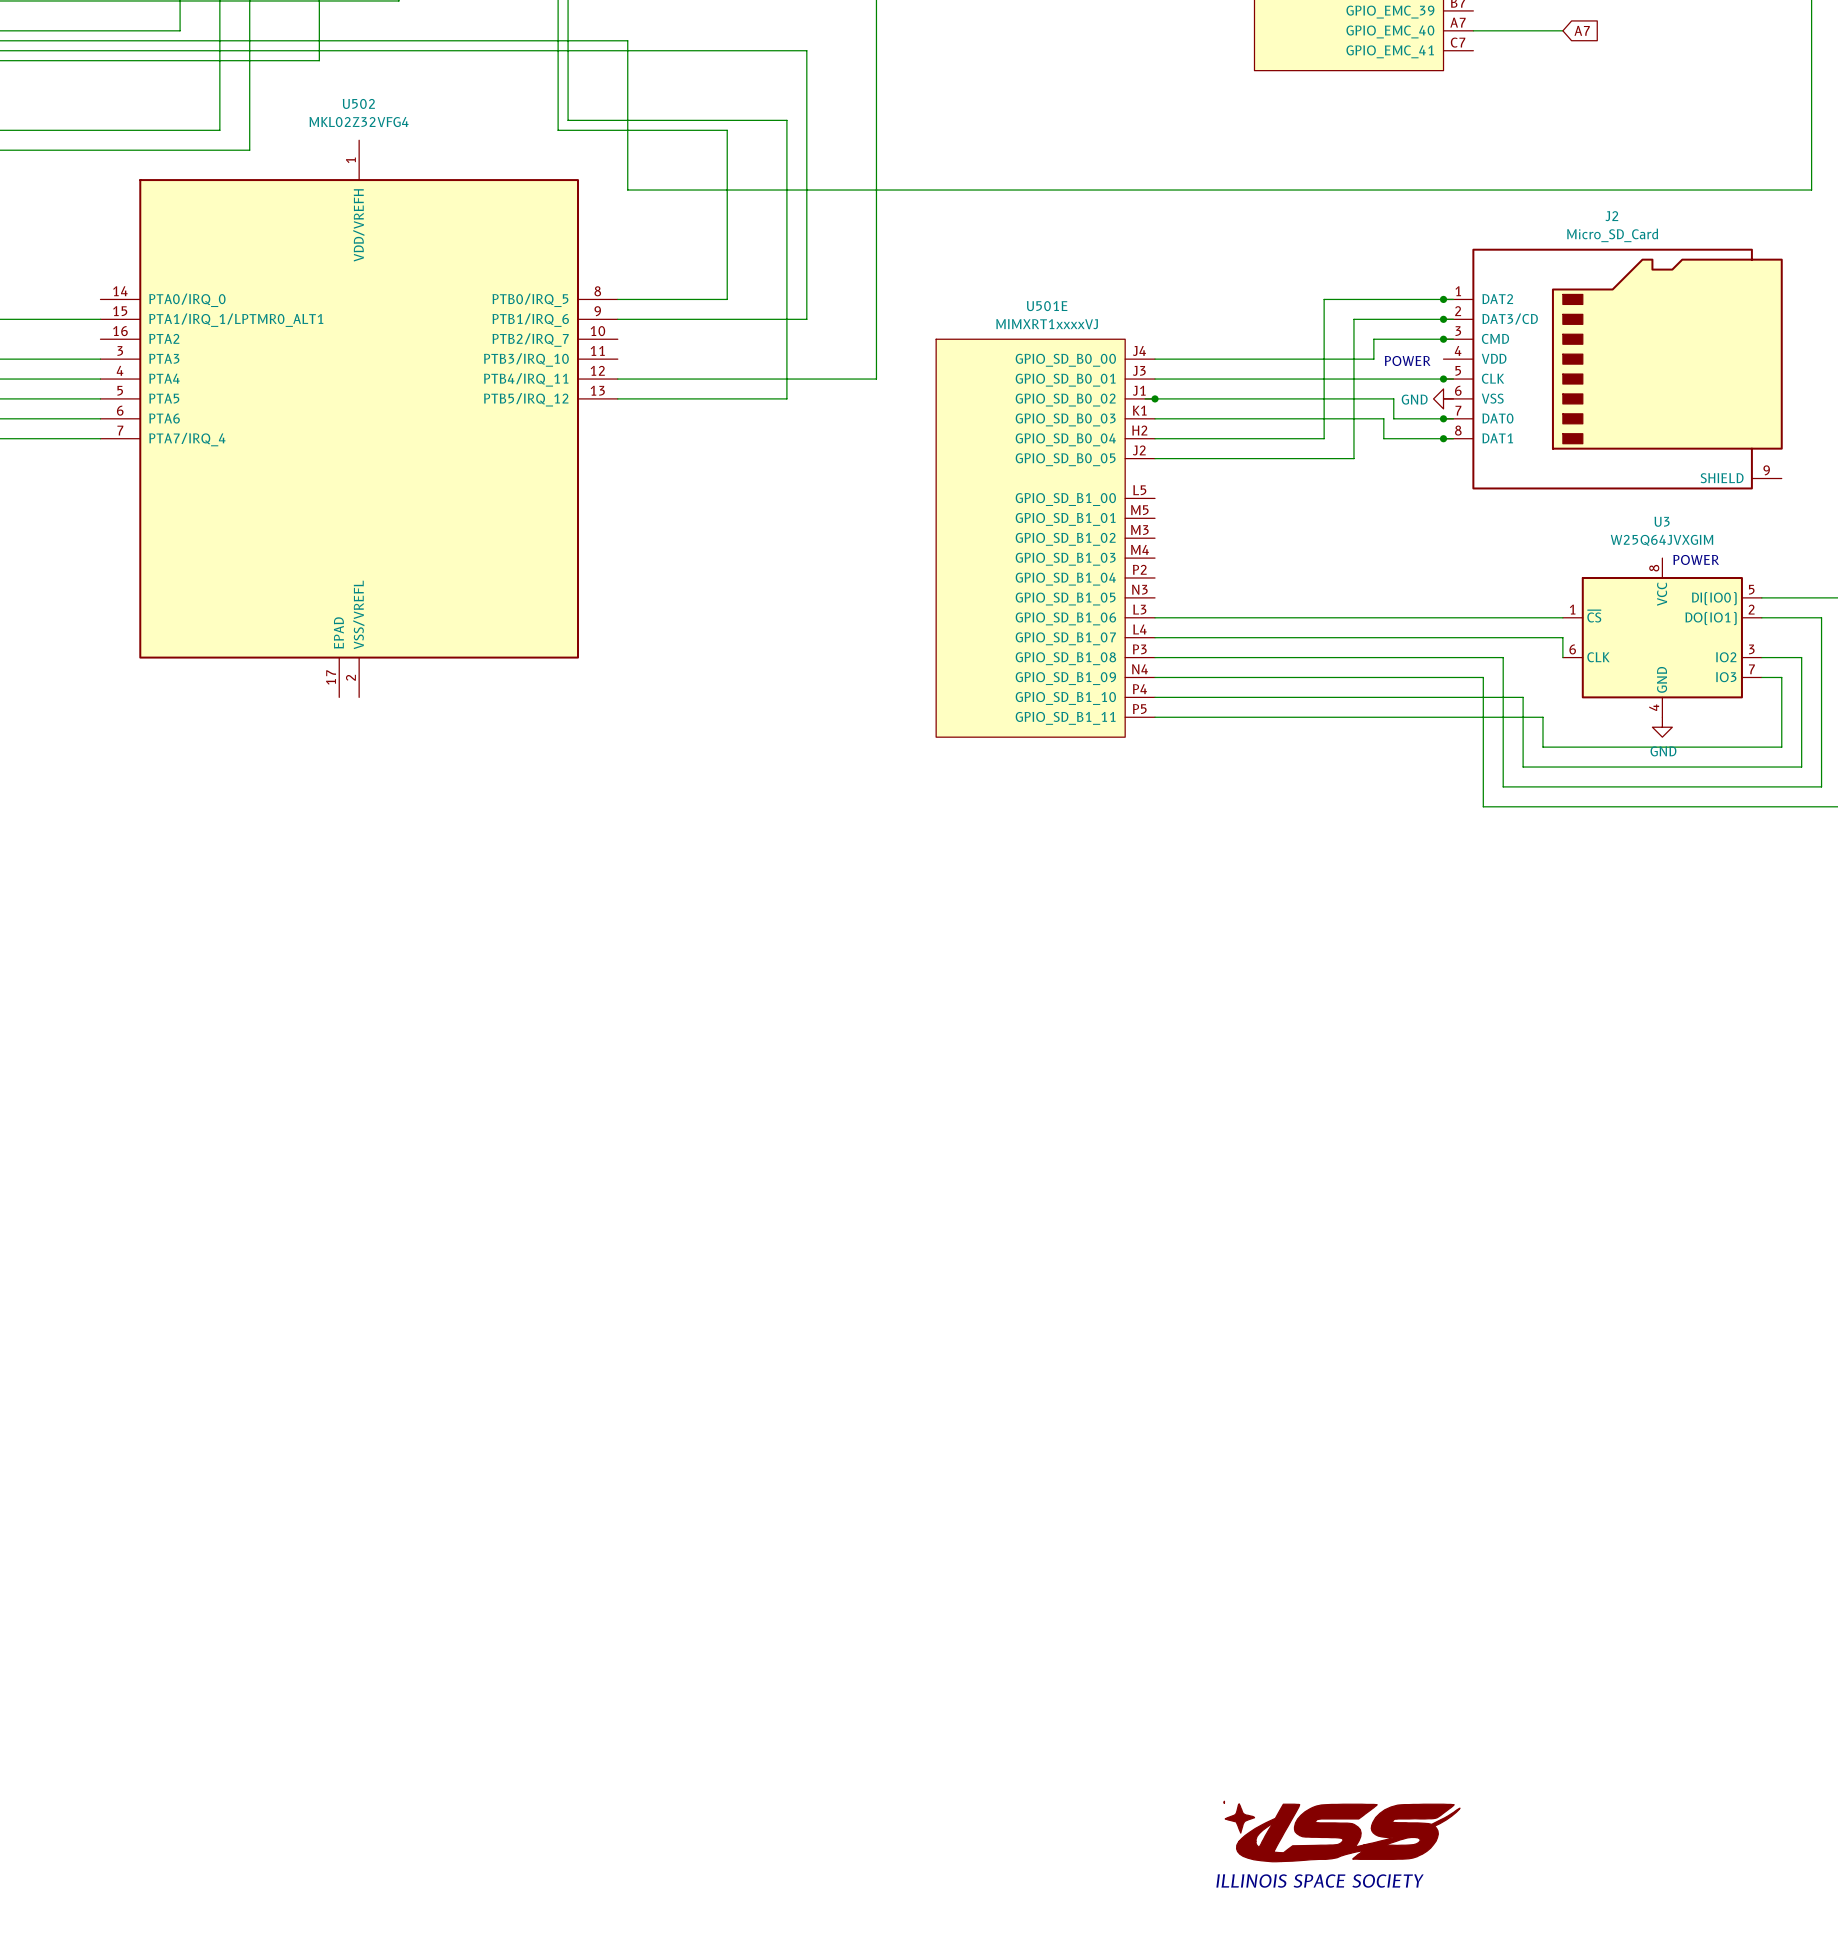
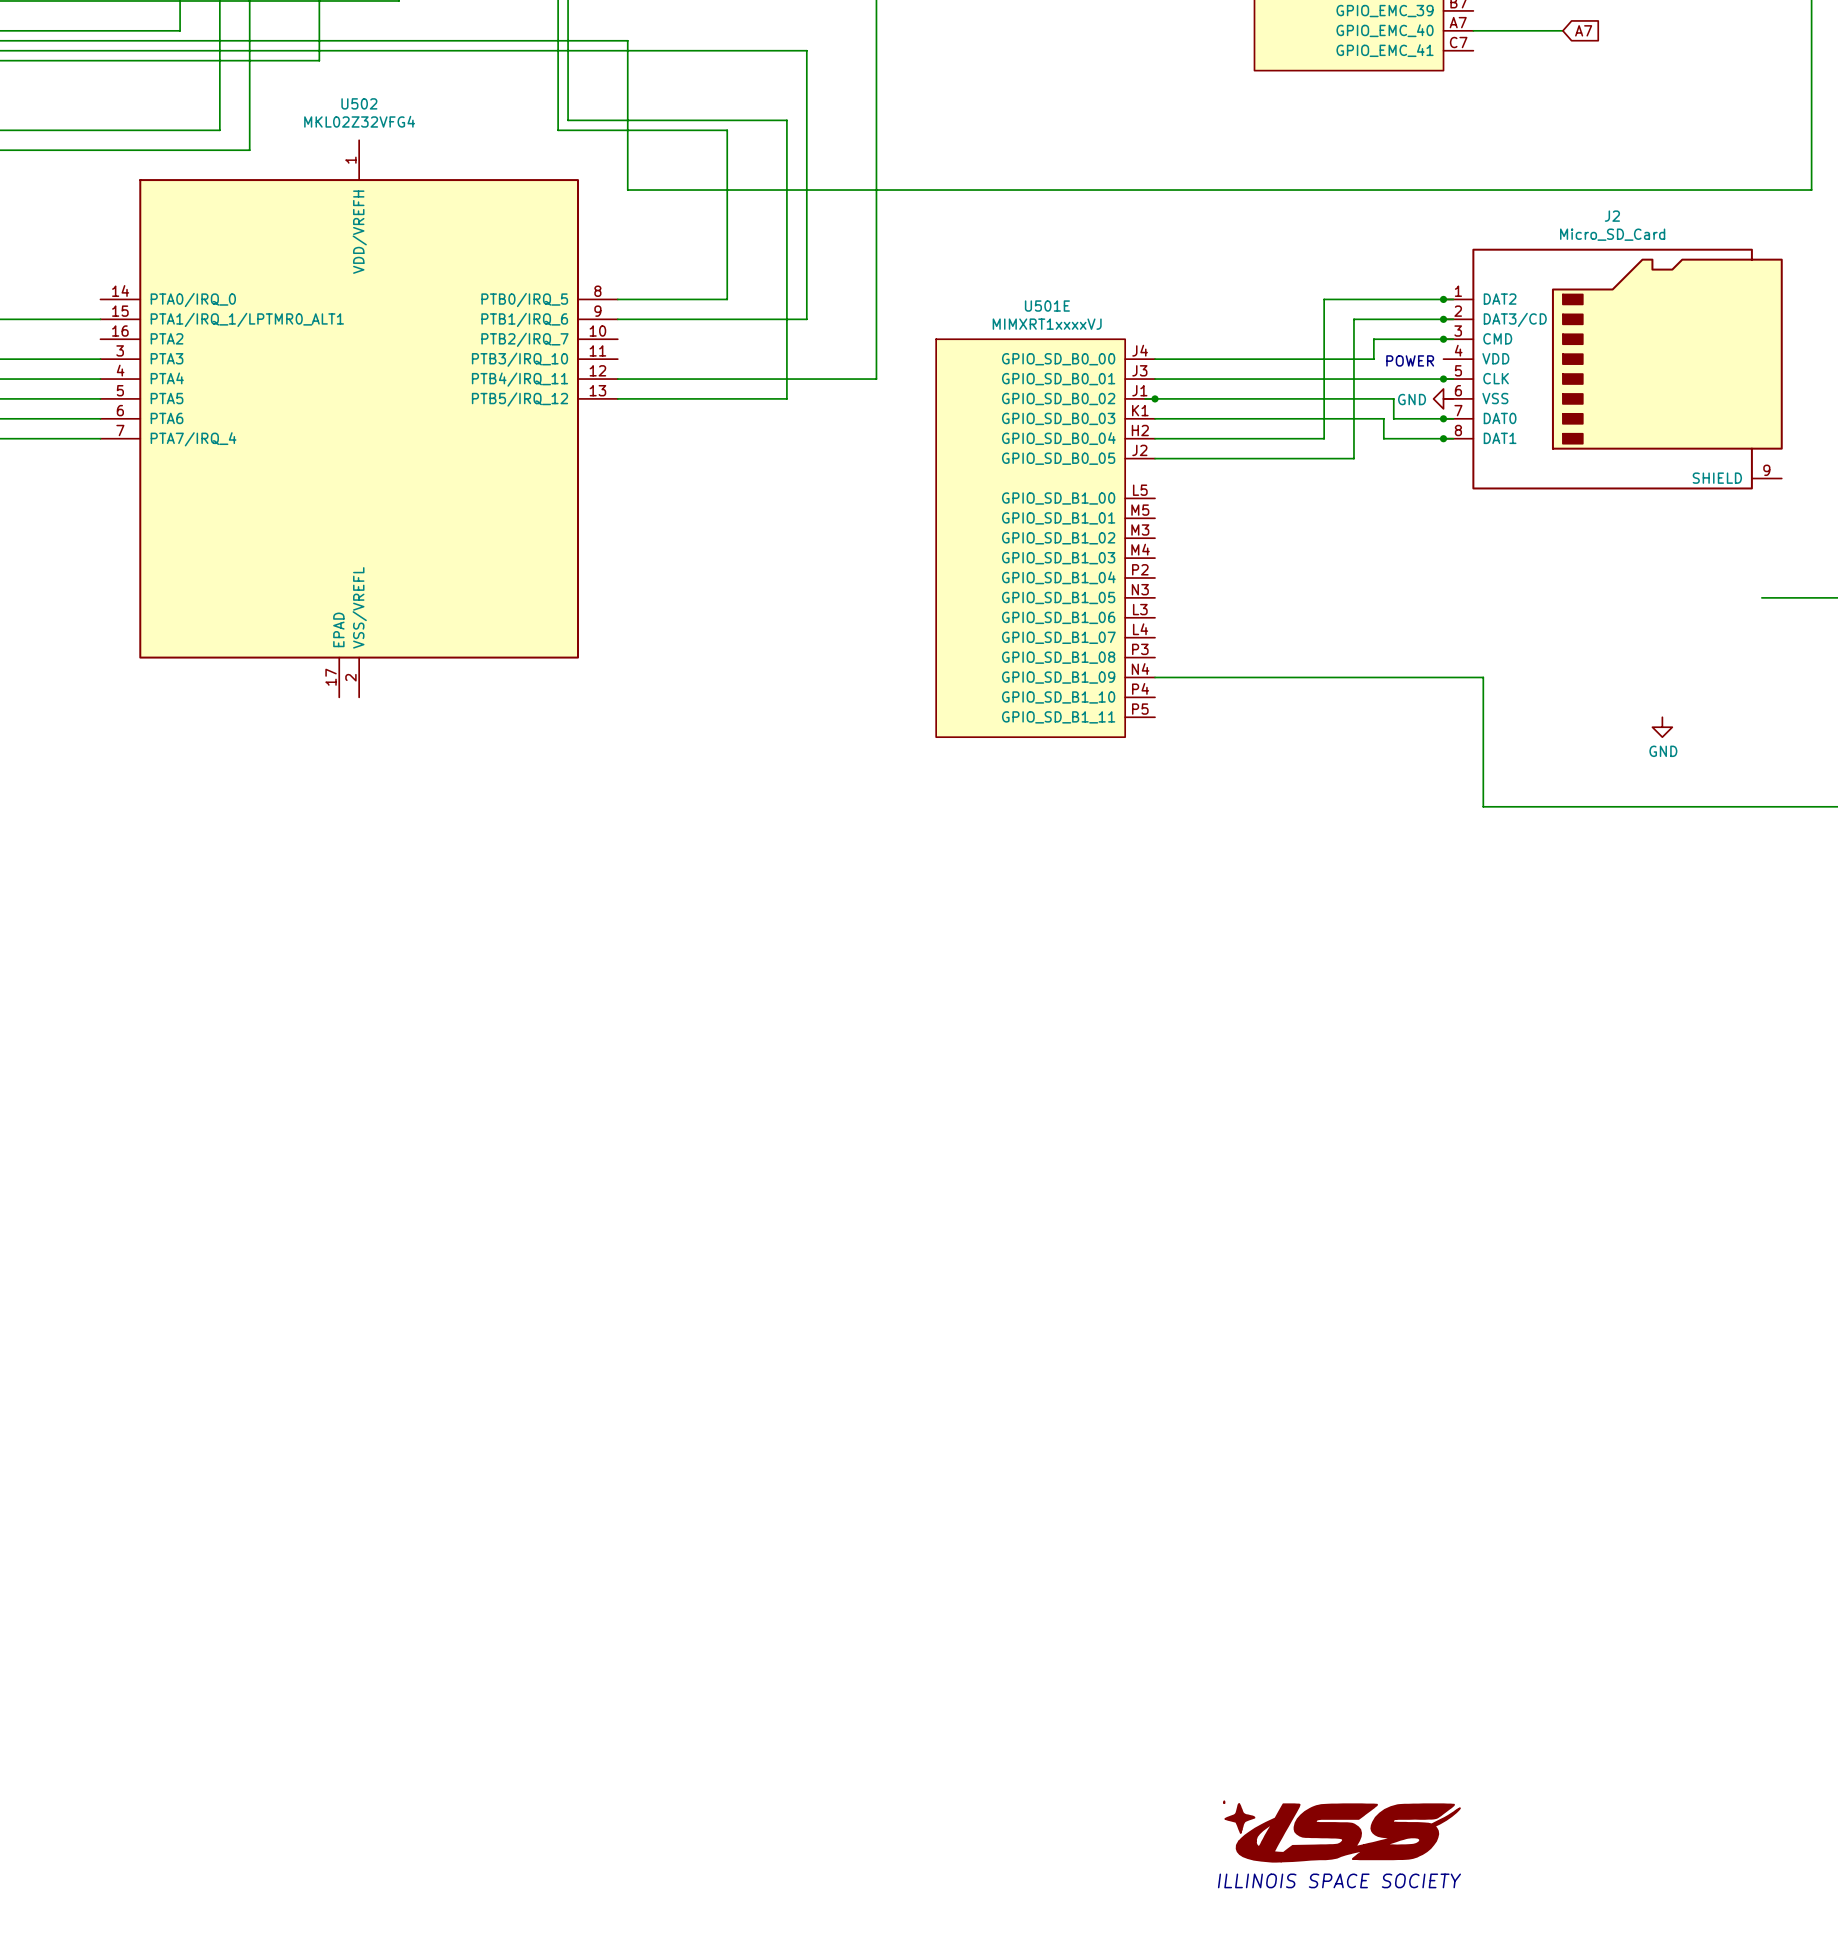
text: POWER (1696, 559) -> none
wire: (1155, 617) (1562, 617) -> none
wire: (1761, 617) (1821, 617) (1821, 786) (1503, 786) (1503, 657) (1155, 657) -> none
wire: (1155, 637) (1562, 637) (1562, 657) -> none
U3: W25Q64JVXGIM (1662, 637) -> none
wire: (1761, 657) (1801, 657) (1801, 767) (1523, 767) (1523, 697) (1155, 697) -> none
wire: (1761, 677) (1781, 677) (1781, 747) (1543, 747) (1543, 717) (1155, 717) -> none

